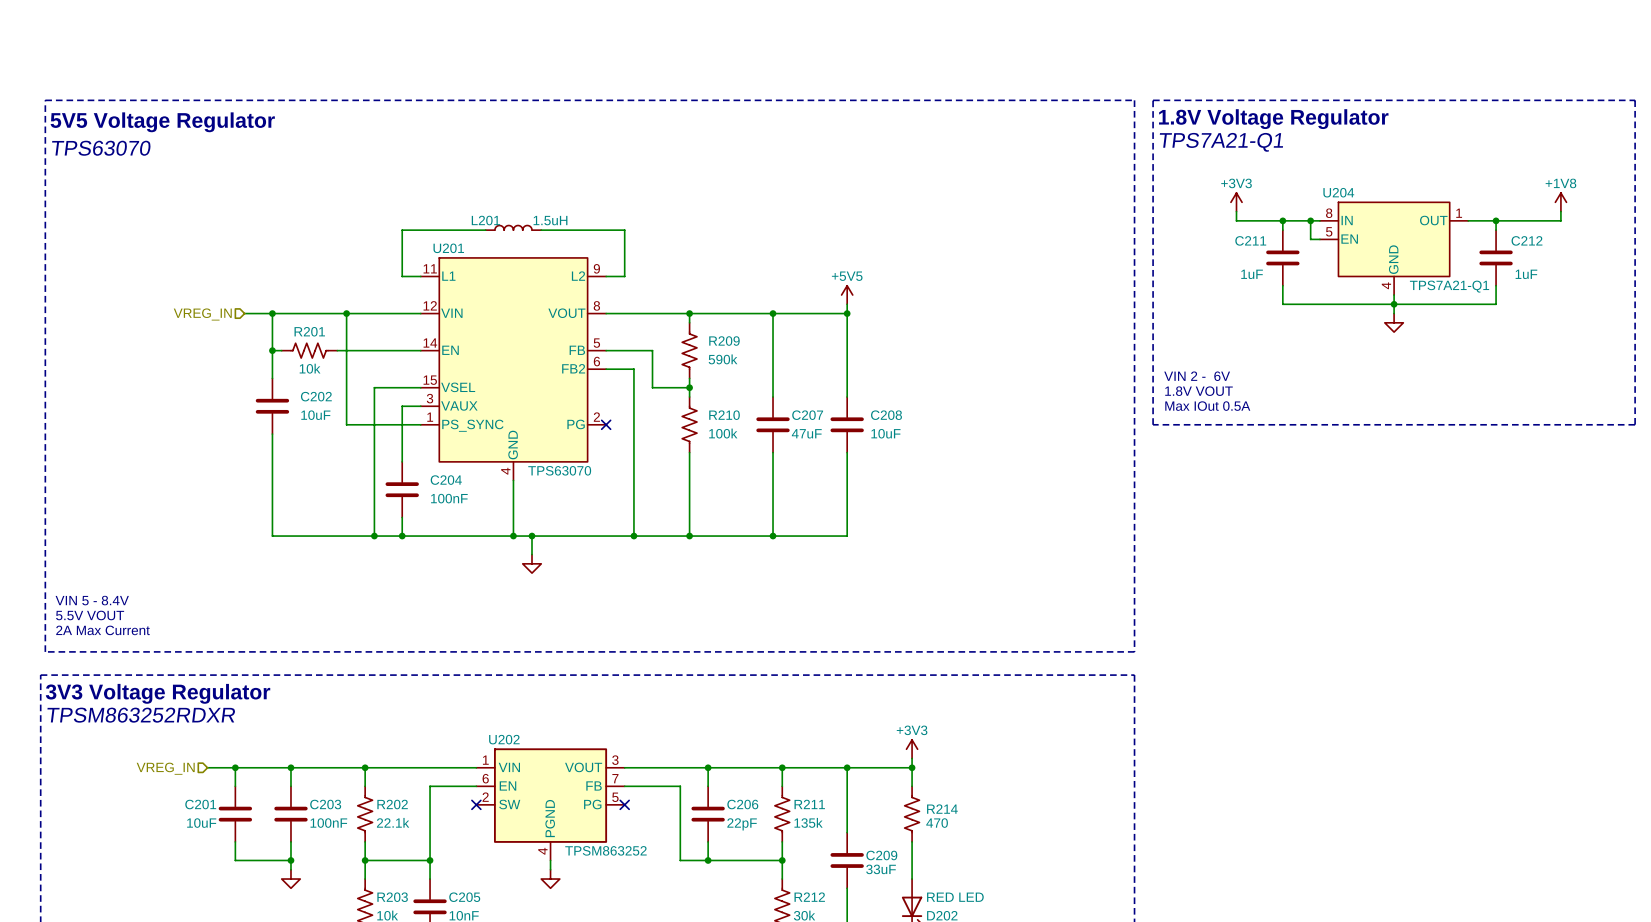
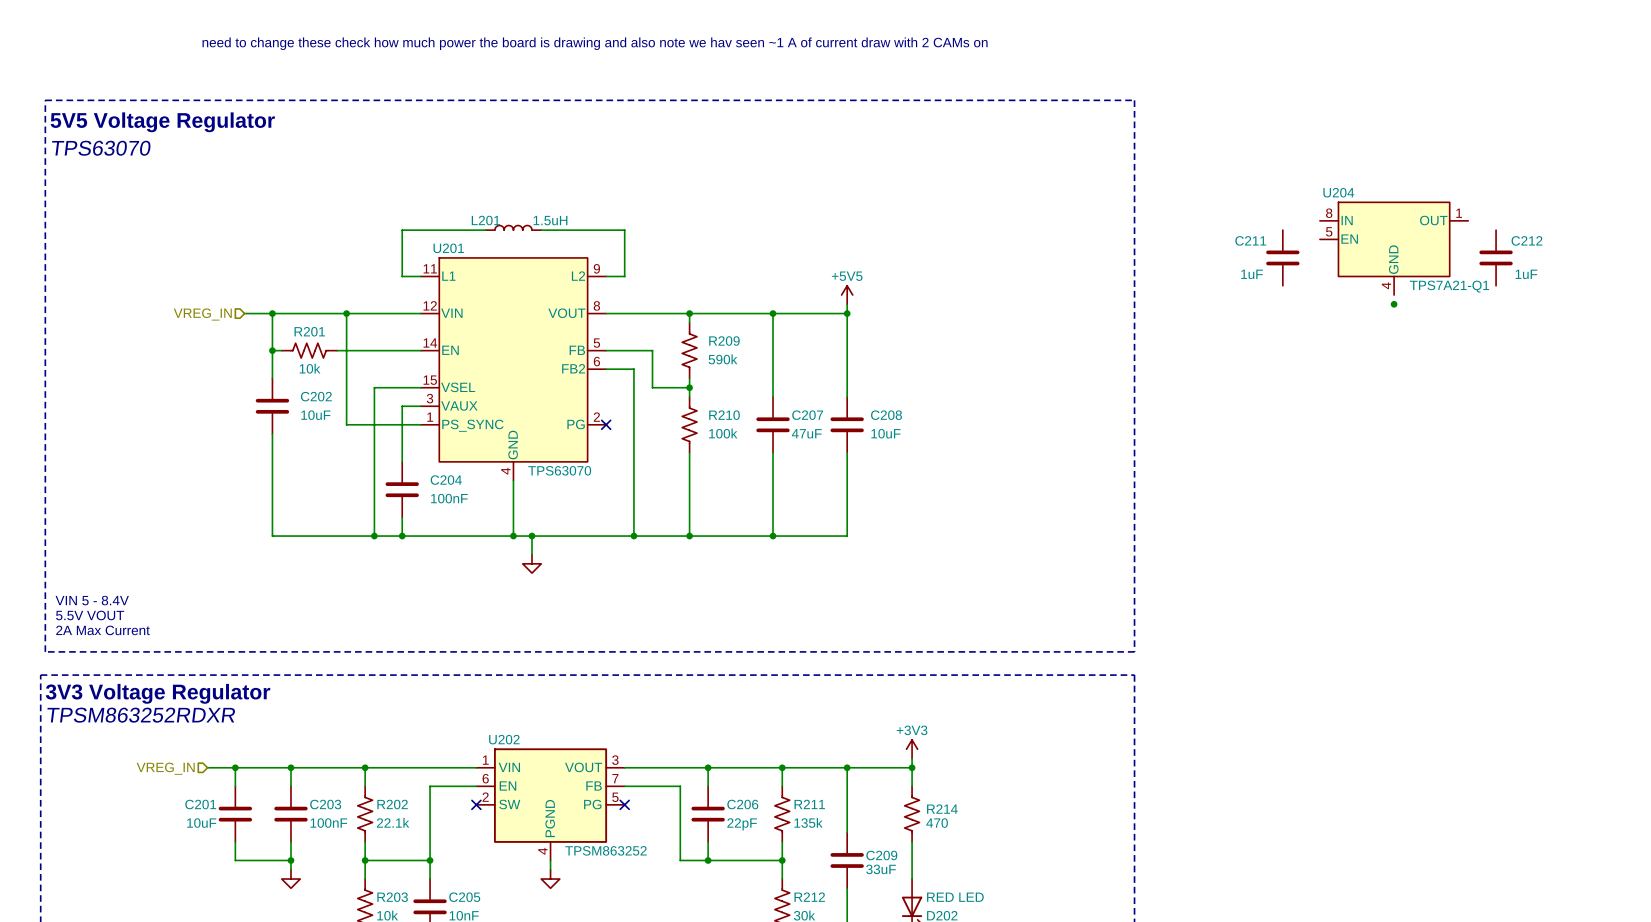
text: none -> need to change these check how much power the board is drawing and also note we hav seen ~1 A of current draw with 2 CAMs on (595, 43)
line: (1153, 100) (1635, 100) (1635, 424) (1153, 424) (1153, 100) -> none
text: 1.8V Voltage Regulator (1273, 119) -> none
text: TPS7A21-Q1 (1221, 142) -> none
power symbol: +3V3 (1236, 202) -> none
power symbol: +1V8 (1560, 202) -> none
wire: (1236, 211) (1236, 220) (1319, 220) -> none
wire: (1560, 211) (1560, 220) (1468, 220) -> none
wire: (1282, 220) (1282, 230) -> none
junction: (1282, 220) -> none
wire: (1310, 220) (1310, 239) (1319, 239) -> none
junction: (1310, 220) -> none
wire: (1496, 220) (1496, 230) -> none
junction: (1496, 220) -> none
wire: (1282, 285) (1282, 304) (1496, 304) (1496, 285) -> none
wire: (1394, 295) (1394, 313) -> none
power symbol: (1394, 322) -> none
text: VIN 2 - 6V (1197, 376) -> none
text: 1.8V VOUT (1199, 391) -> none
text: Max IOut 0.5A (1207, 406) -> none

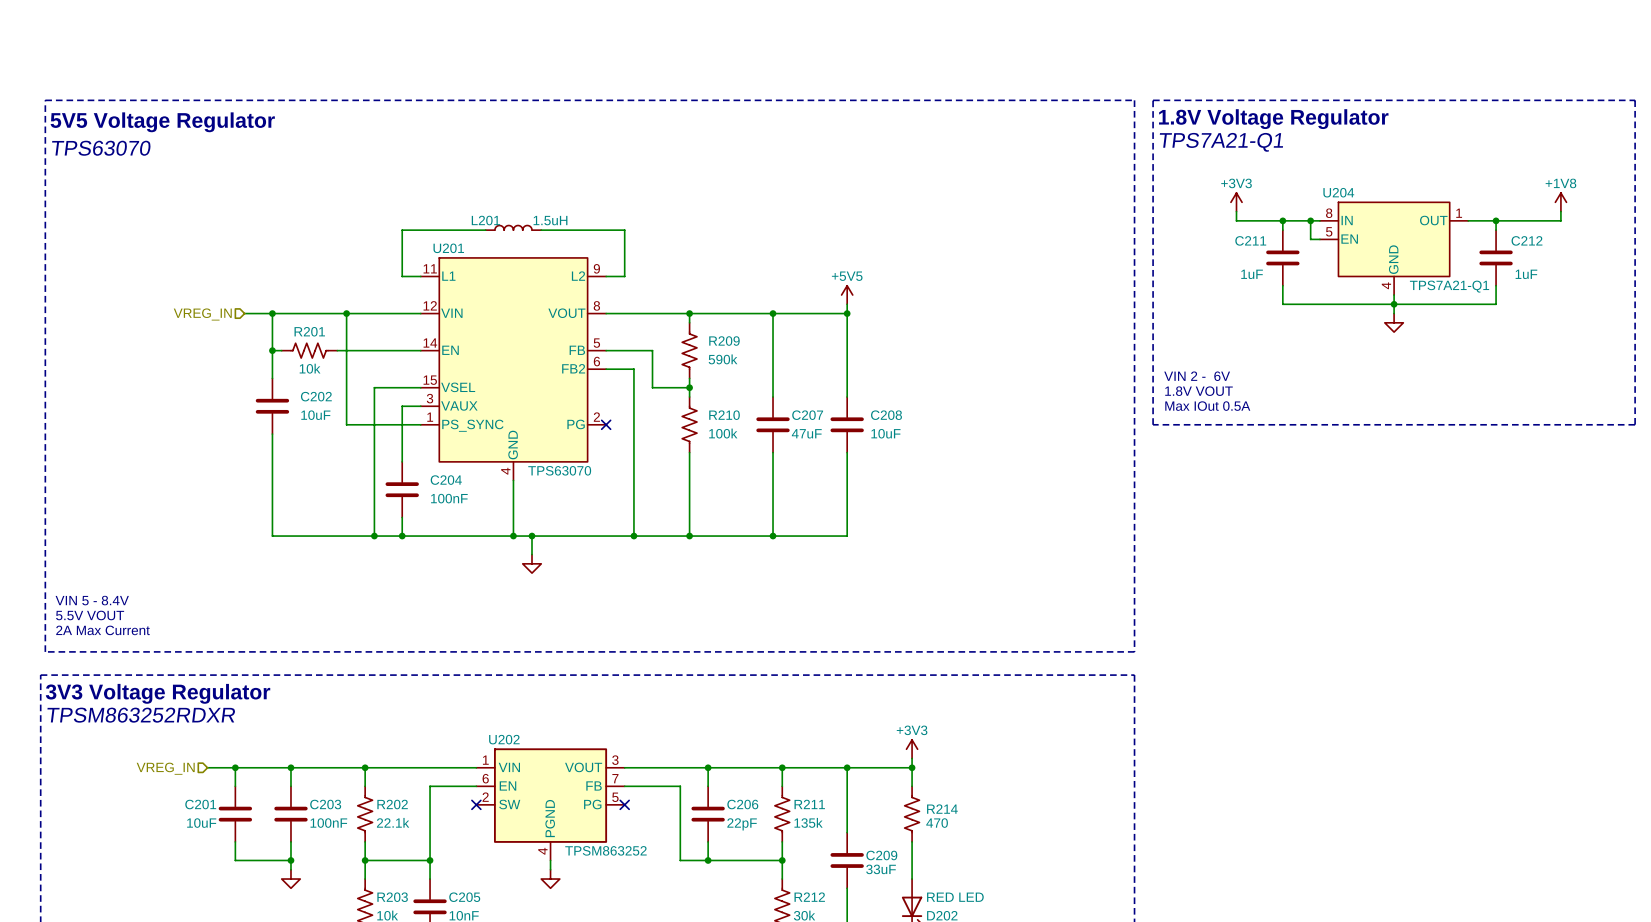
text: need to change these check how much power the board is drawing and also note we hav seen ~1 A of current draw with 2 CAMs on (595, 43) -> none
line: none -> (1153, 100) (1635, 100) (1635, 424) (1153, 424) (1153, 100)
text: none -> 1.8V Voltage Regulator (1273, 119)
text: none -> TPS7A21-Q1 (1221, 142)
power symbol: none -> +3V3 (1236, 202)
power symbol: none -> +1V8 (1560, 202)
wire: none -> (1236, 211) (1236, 220) (1319, 220)
wire: none -> (1560, 211) (1560, 220) (1468, 220)
wire: none -> (1282, 220) (1282, 230)
junction: none -> (1282, 220)
wire: none -> (1310, 220) (1310, 239) (1319, 239)
junction: none -> (1310, 220)
wire: none -> (1496, 220) (1496, 230)
junction: none -> (1496, 220)
wire: none -> (1282, 285) (1282, 304) (1496, 304) (1496, 285)
wire: none -> (1394, 295) (1394, 313)
power symbol: none -> (1394, 322)
text: none -> VIN 2 - 6V (1197, 376)
text: none -> 1.8V VOUT (1199, 391)
text: none -> Max IOut 0.5A (1207, 406)

